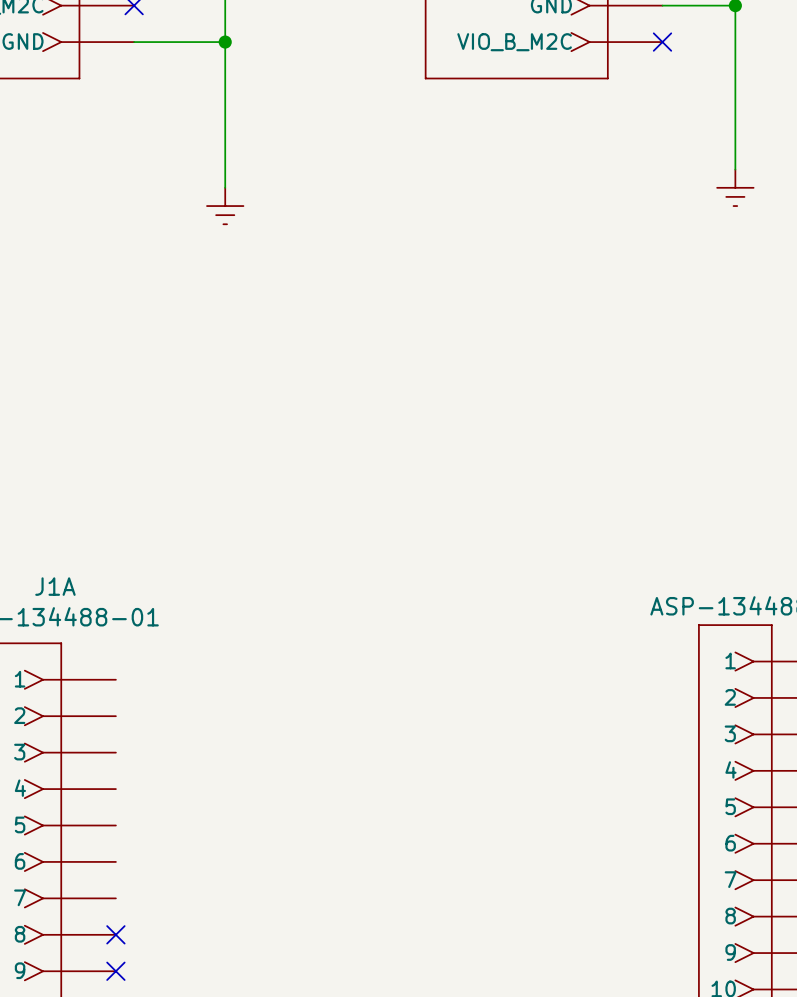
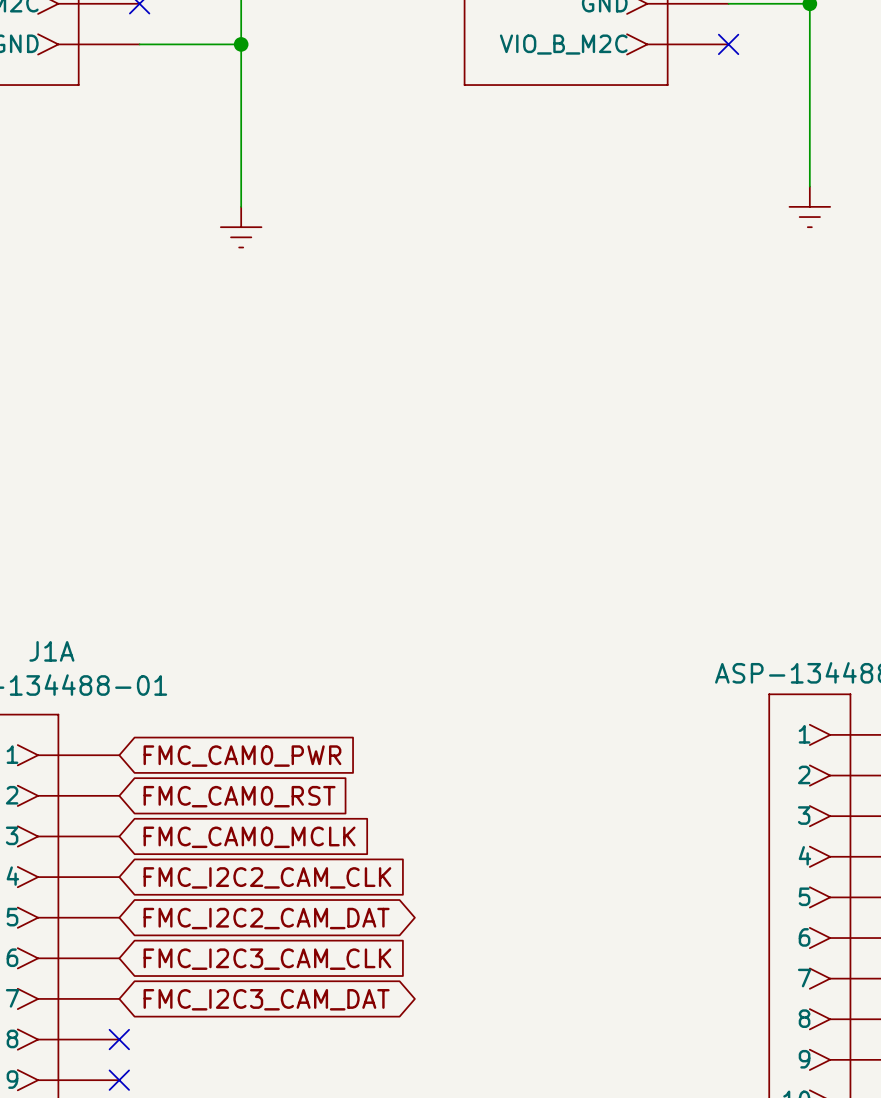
global label: none -> FMC_CAM0_PWR (242, 756)
global label: none -> FMC_CAM0_RST (239, 796)
global label: none -> FMC_CAM0_MCLK (249, 837)
global label: none -> FMC_I2C2_CAM_CLK (267, 877)
global label: none -> FMC_I2C2_CAM_DAT (266, 918)
global label: none -> FMC_I2C3_CAM_CLK (267, 959)
global label: none -> FMC_I2C3_CAM_DAT (266, 999)

